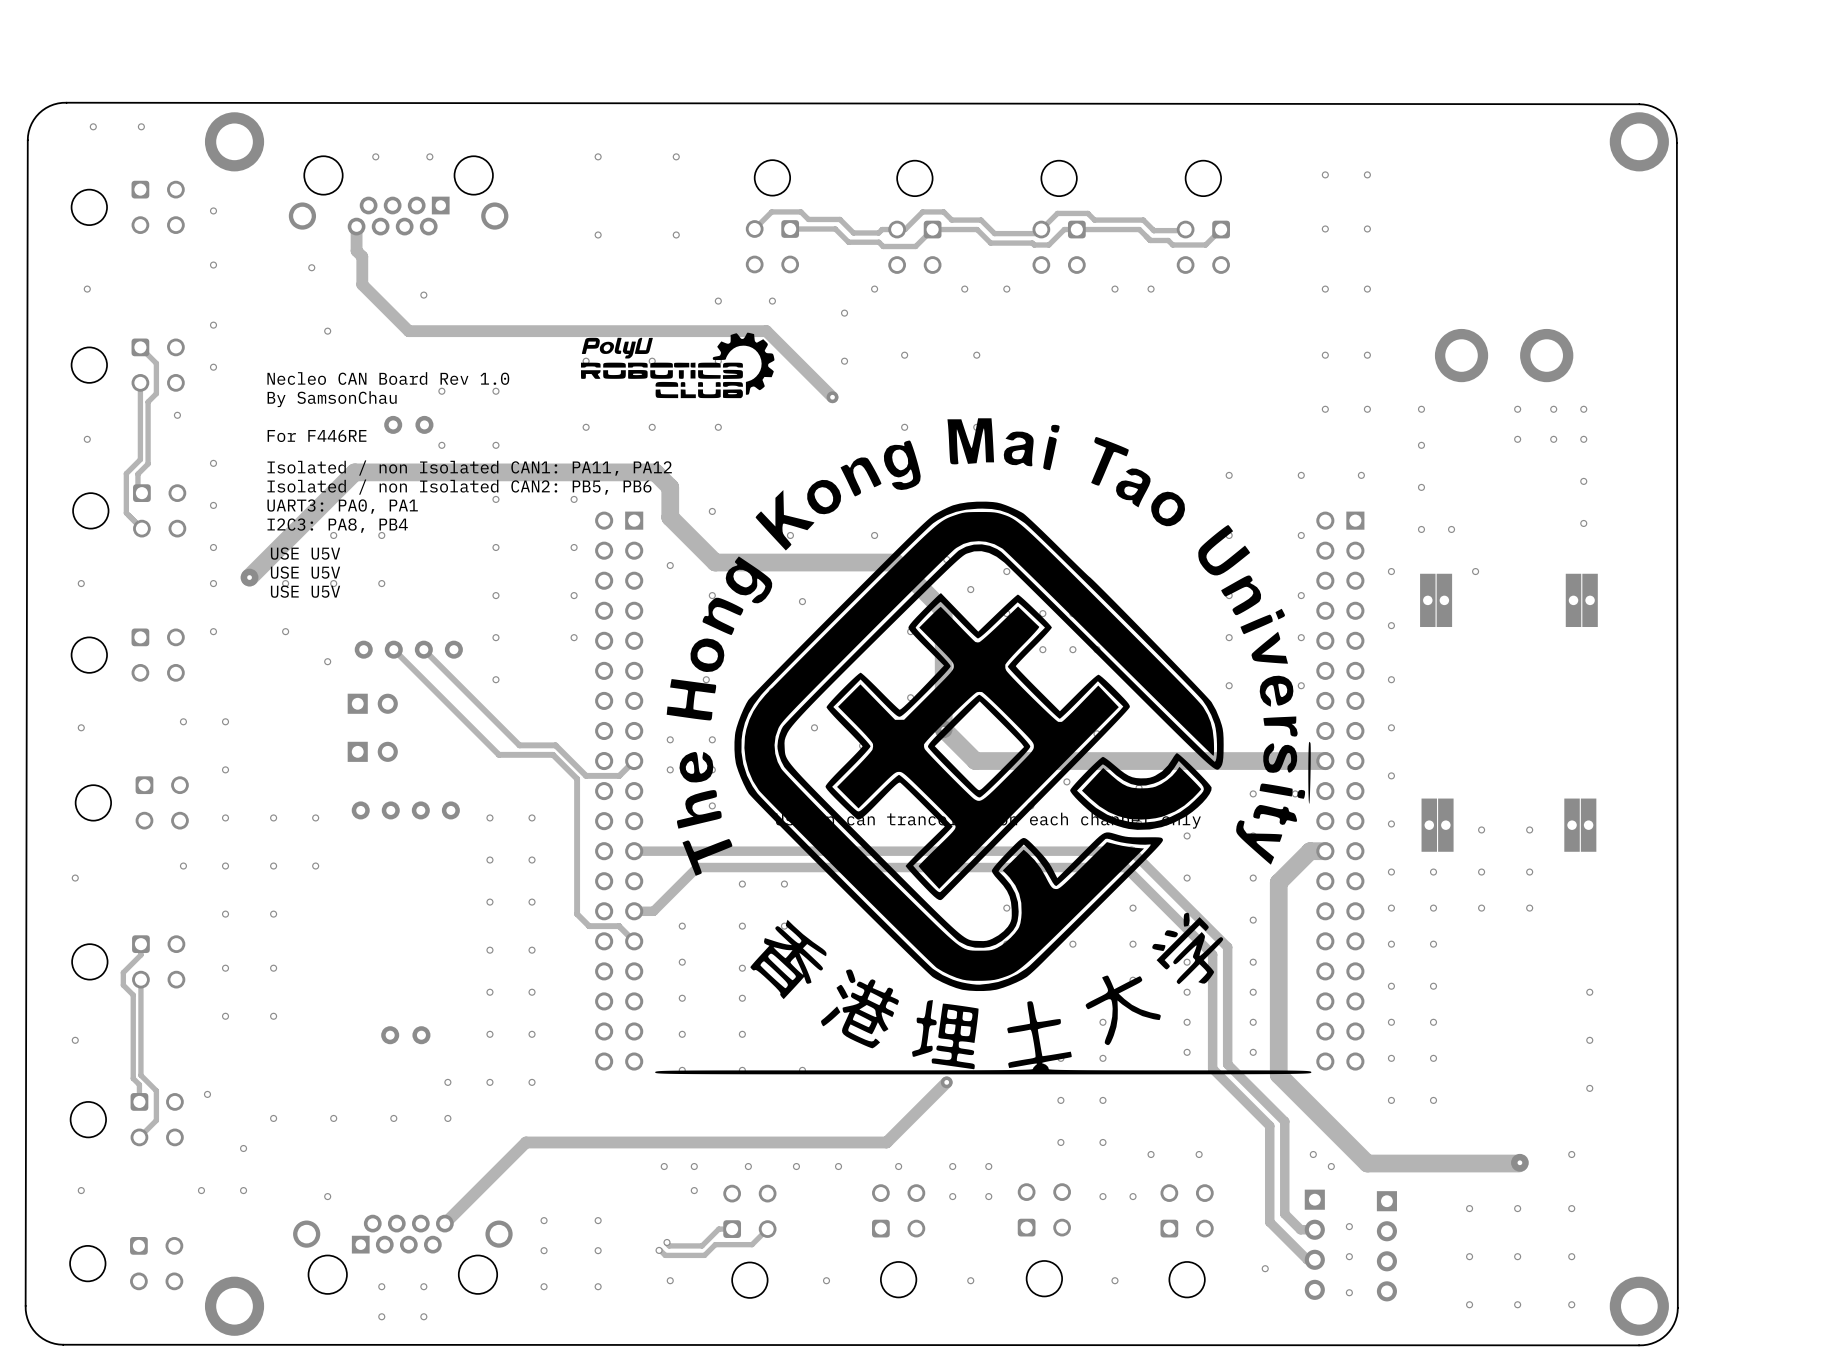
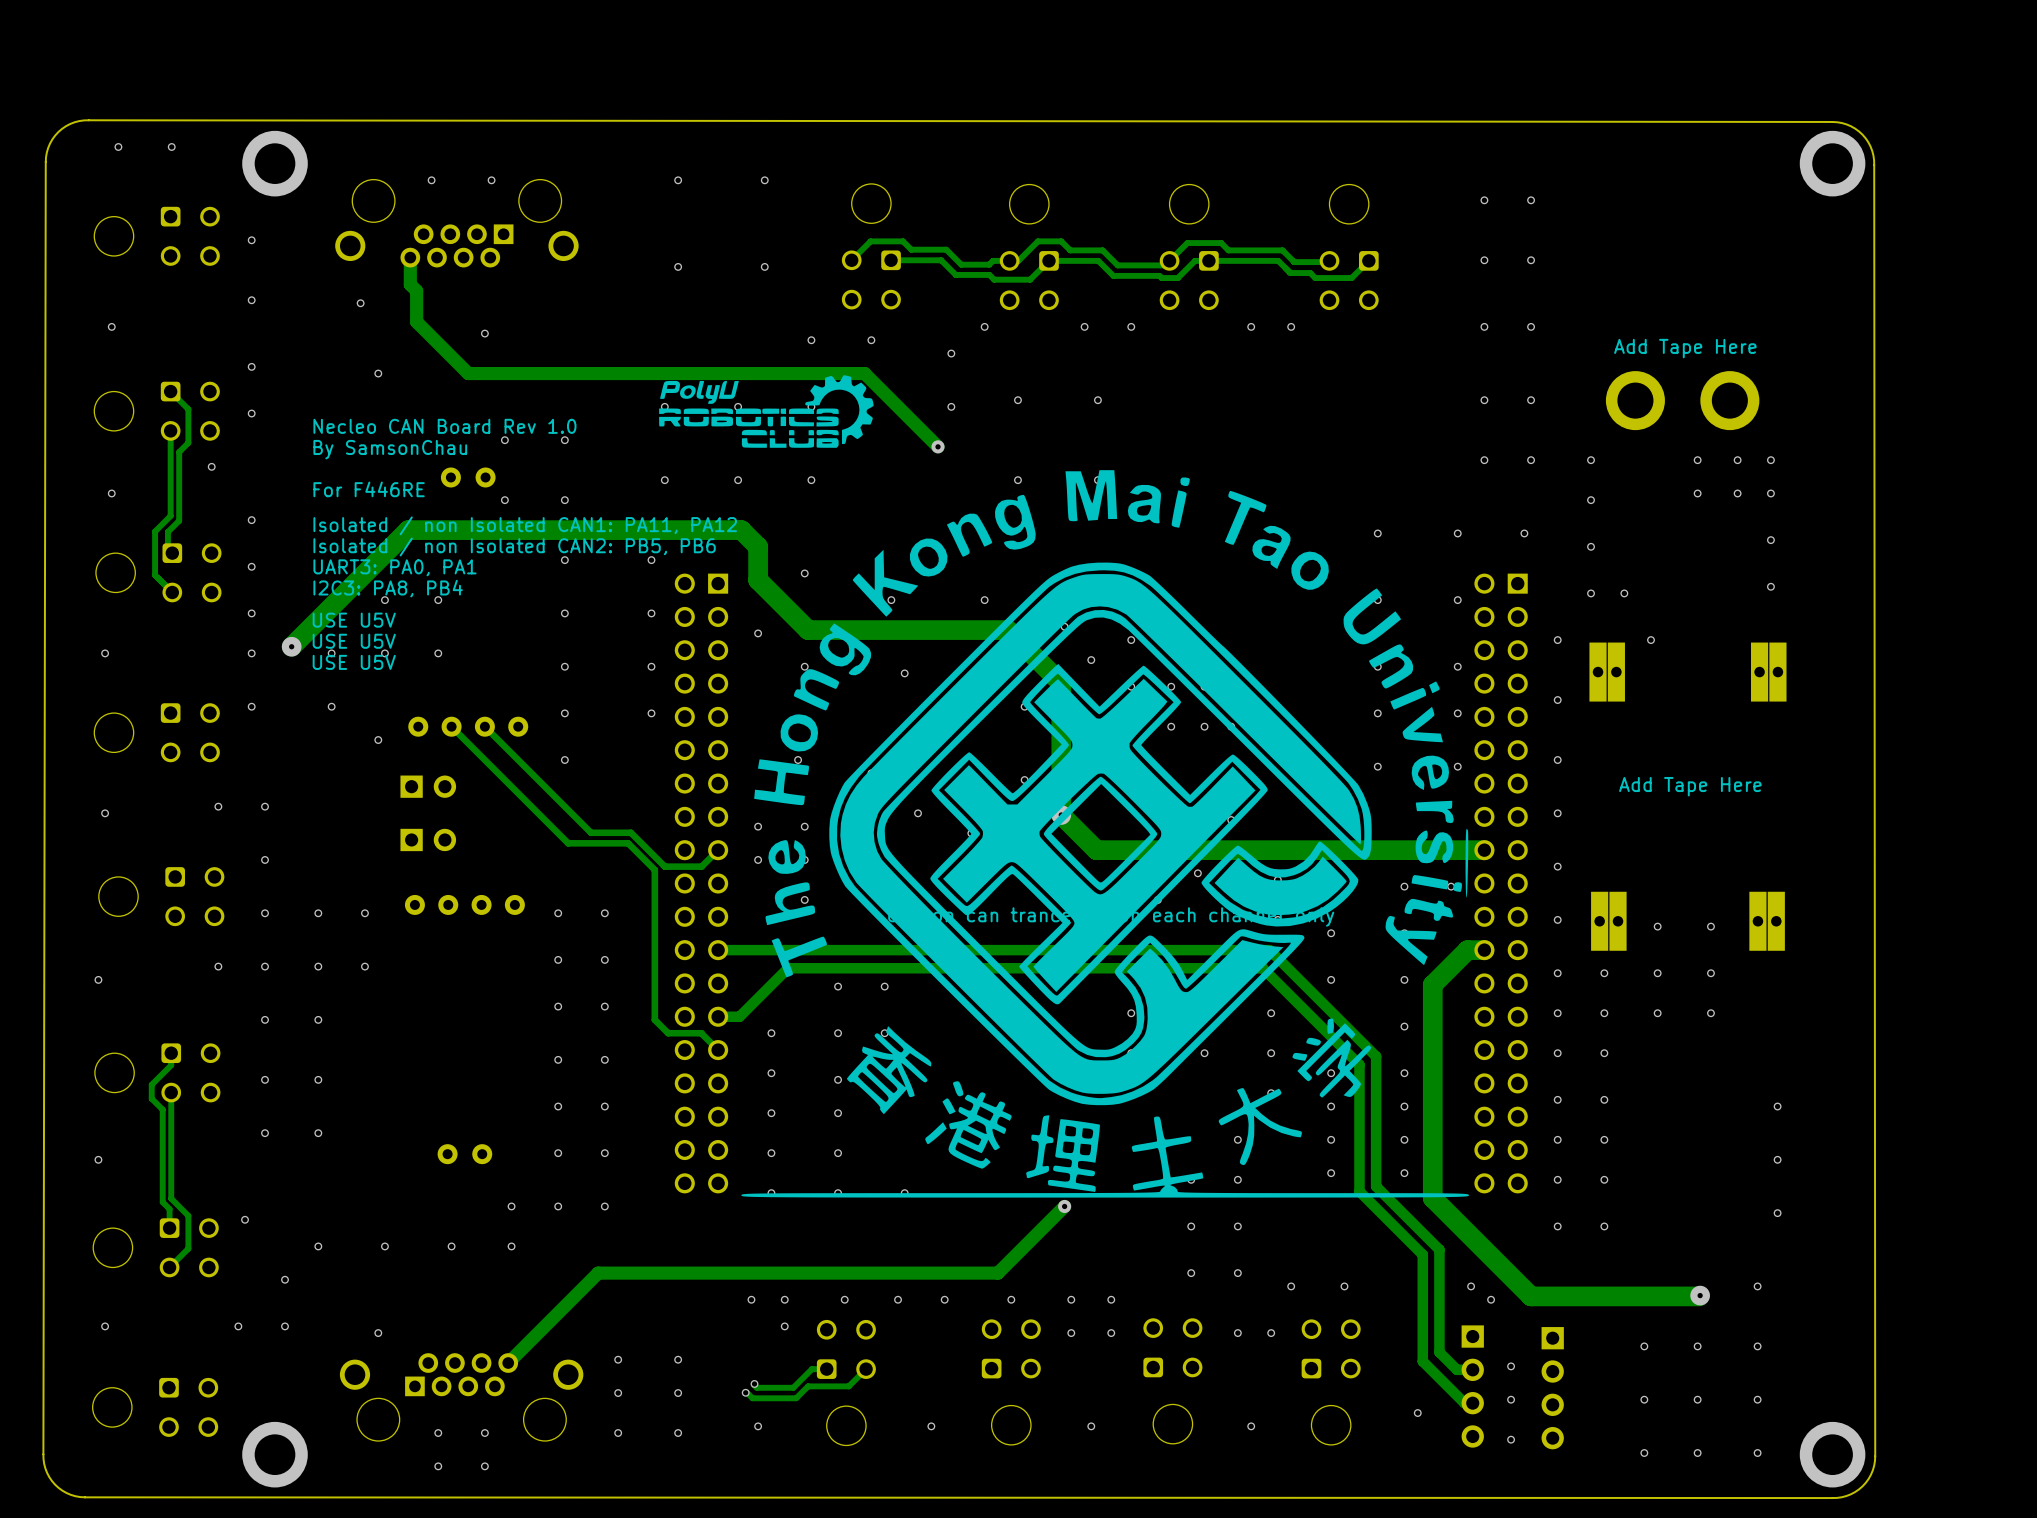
text: none -> Add Tape Here (1685, 348)
text: none -> Add Tape Here (1690, 786)

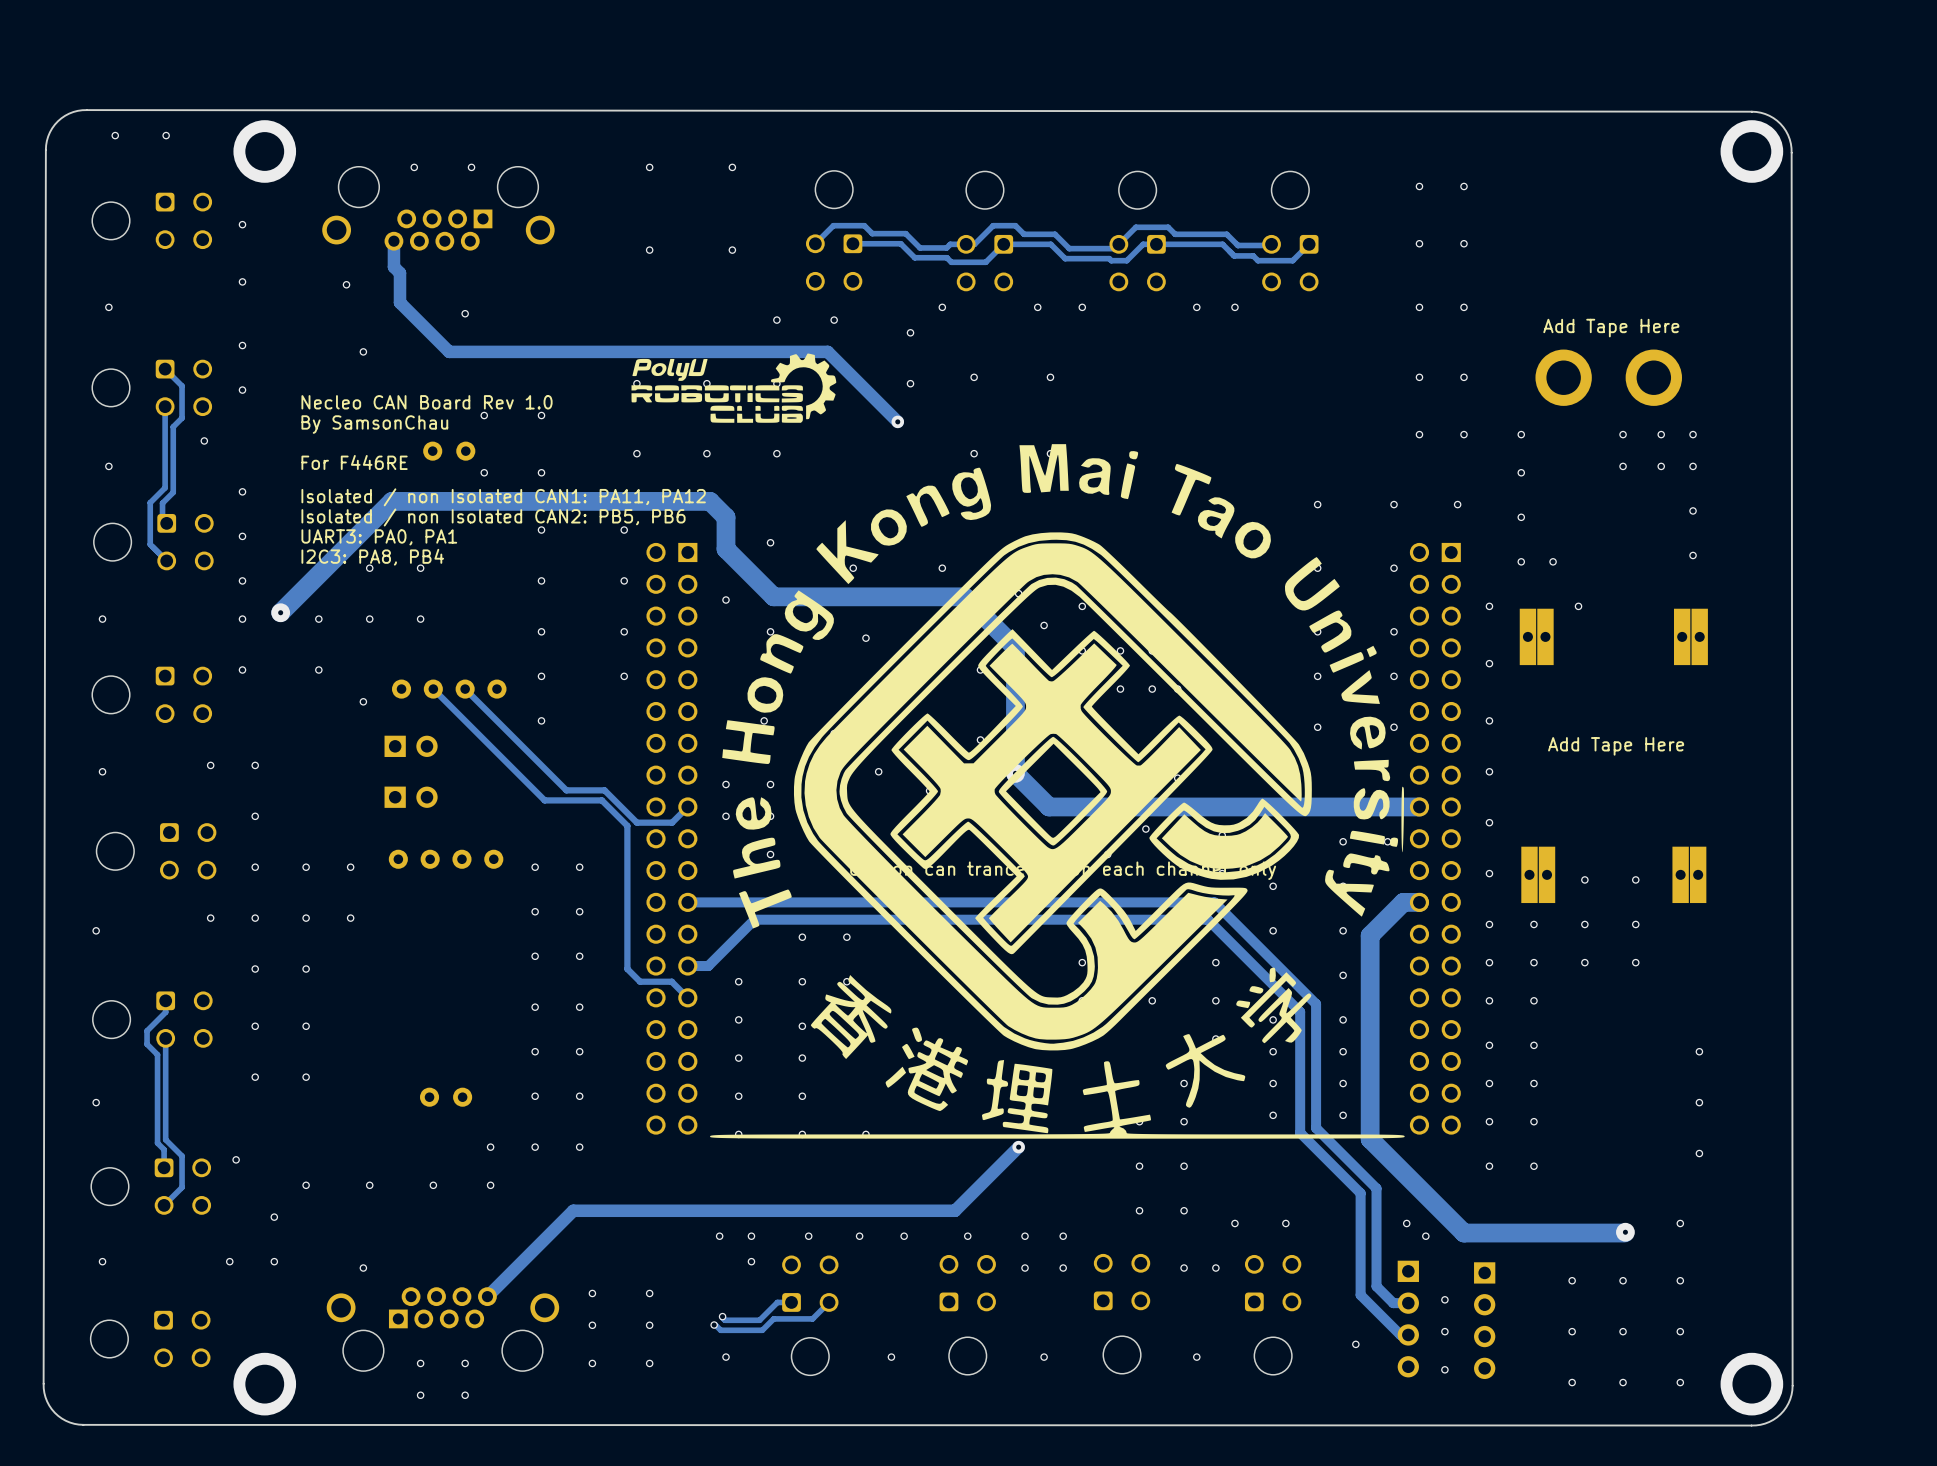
text: USE U5V (354, 620) -> none
text: USE U5V (354, 641) -> none
text: USE U5V (354, 662) -> none

